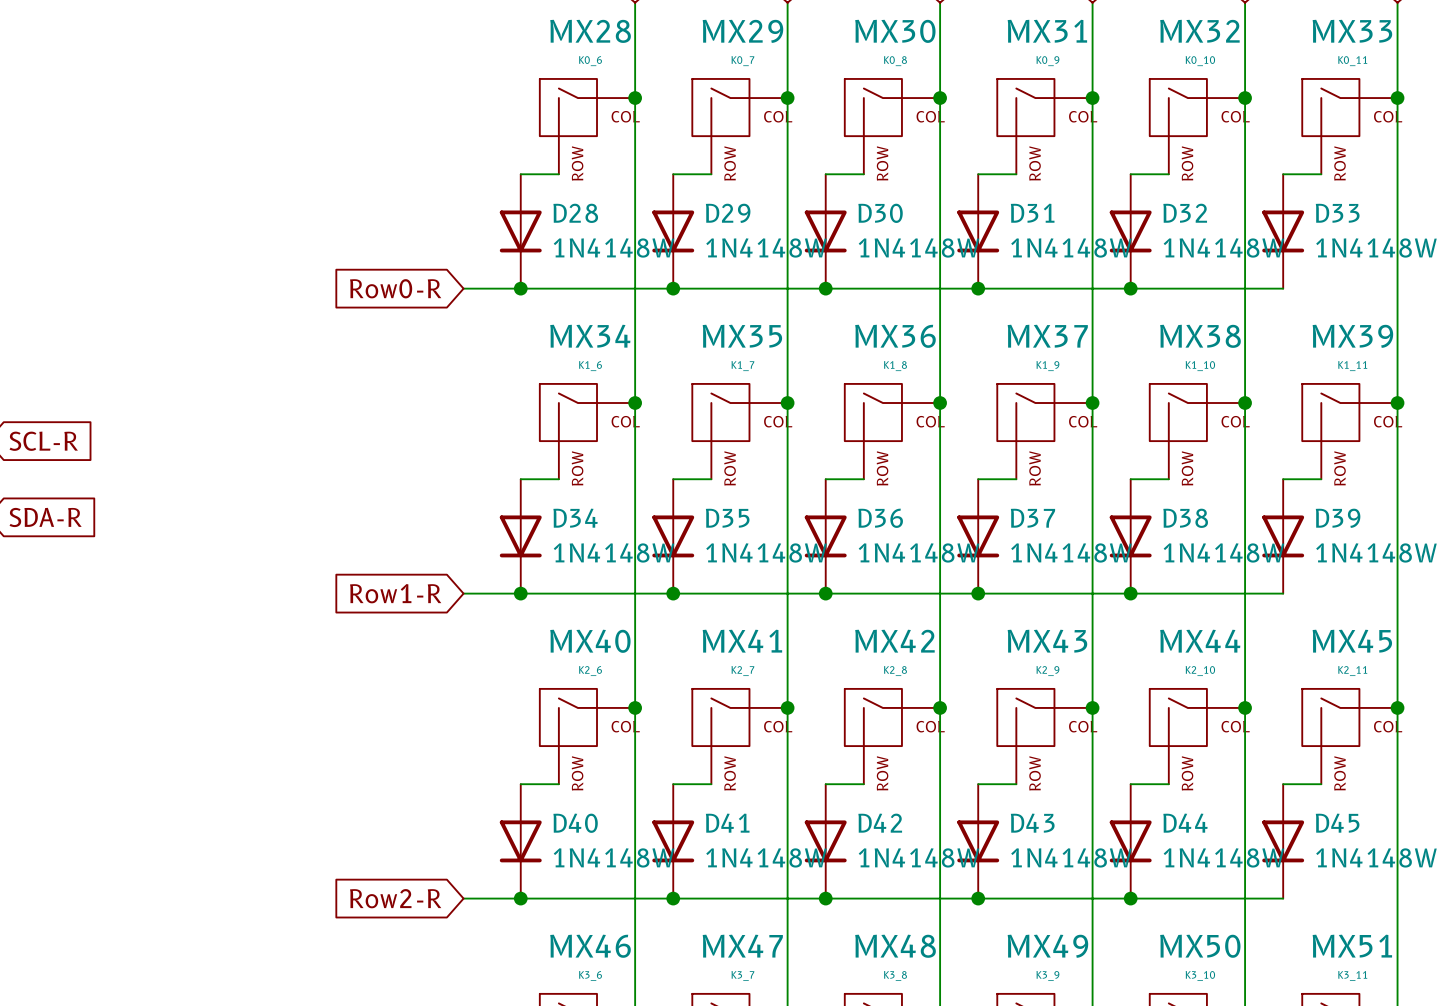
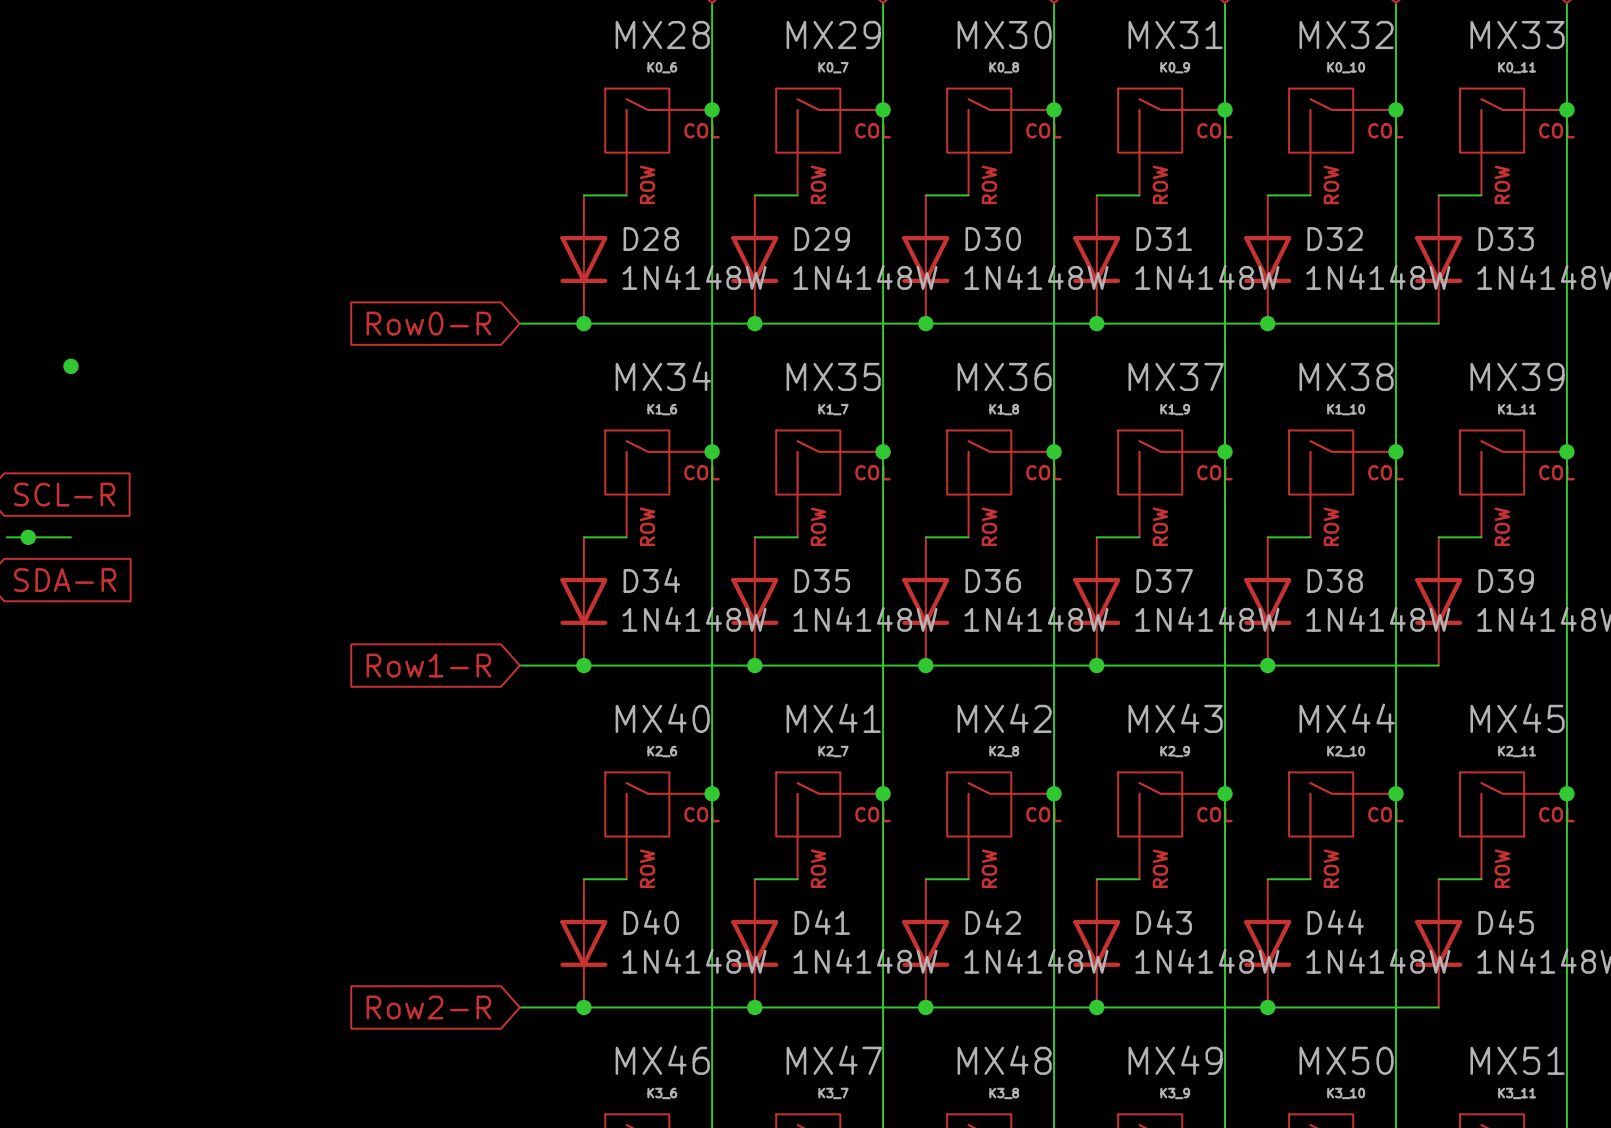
junction: none -> (70, 366)
wire: none -> (6, 537) (70, 537)
junction: none -> (28, 537)

